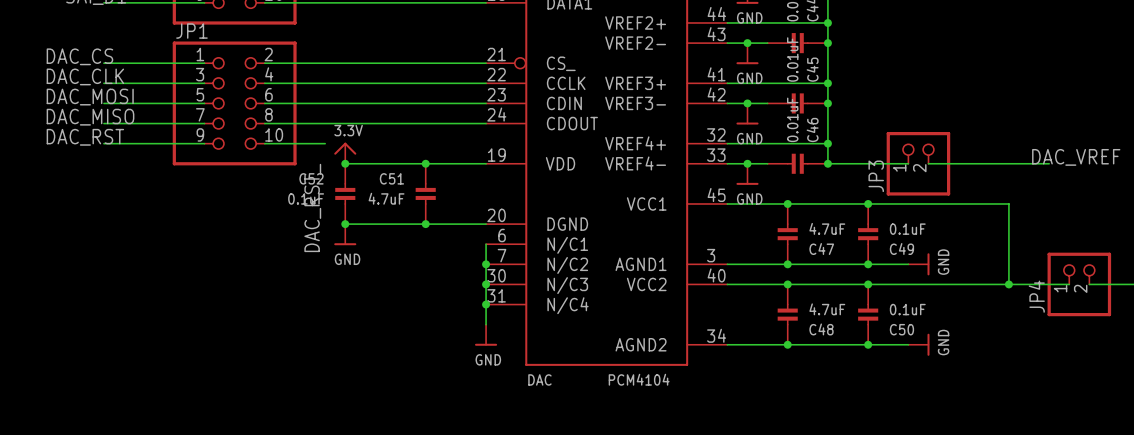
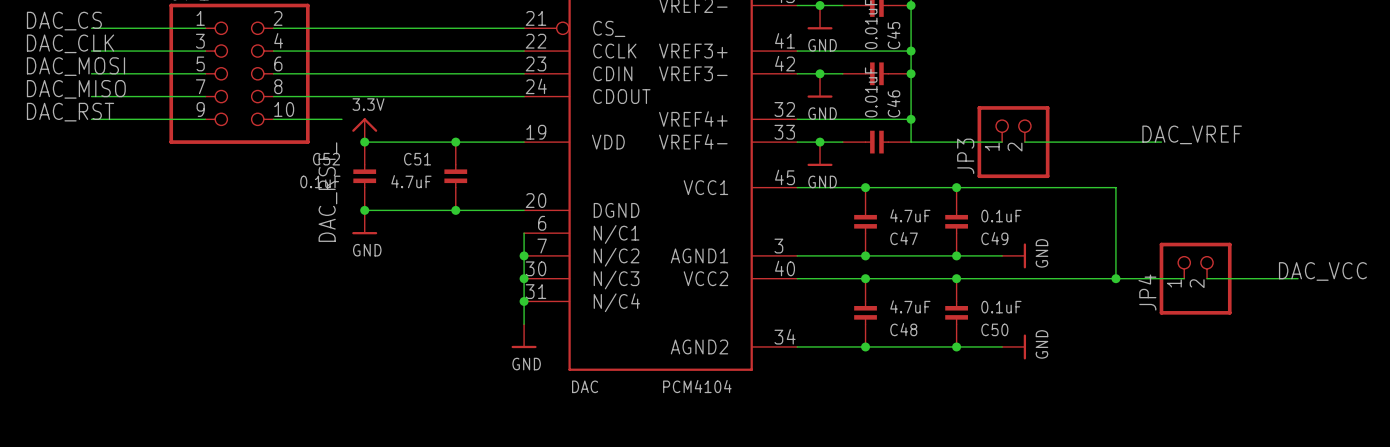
junction: (827, 163) -> none

